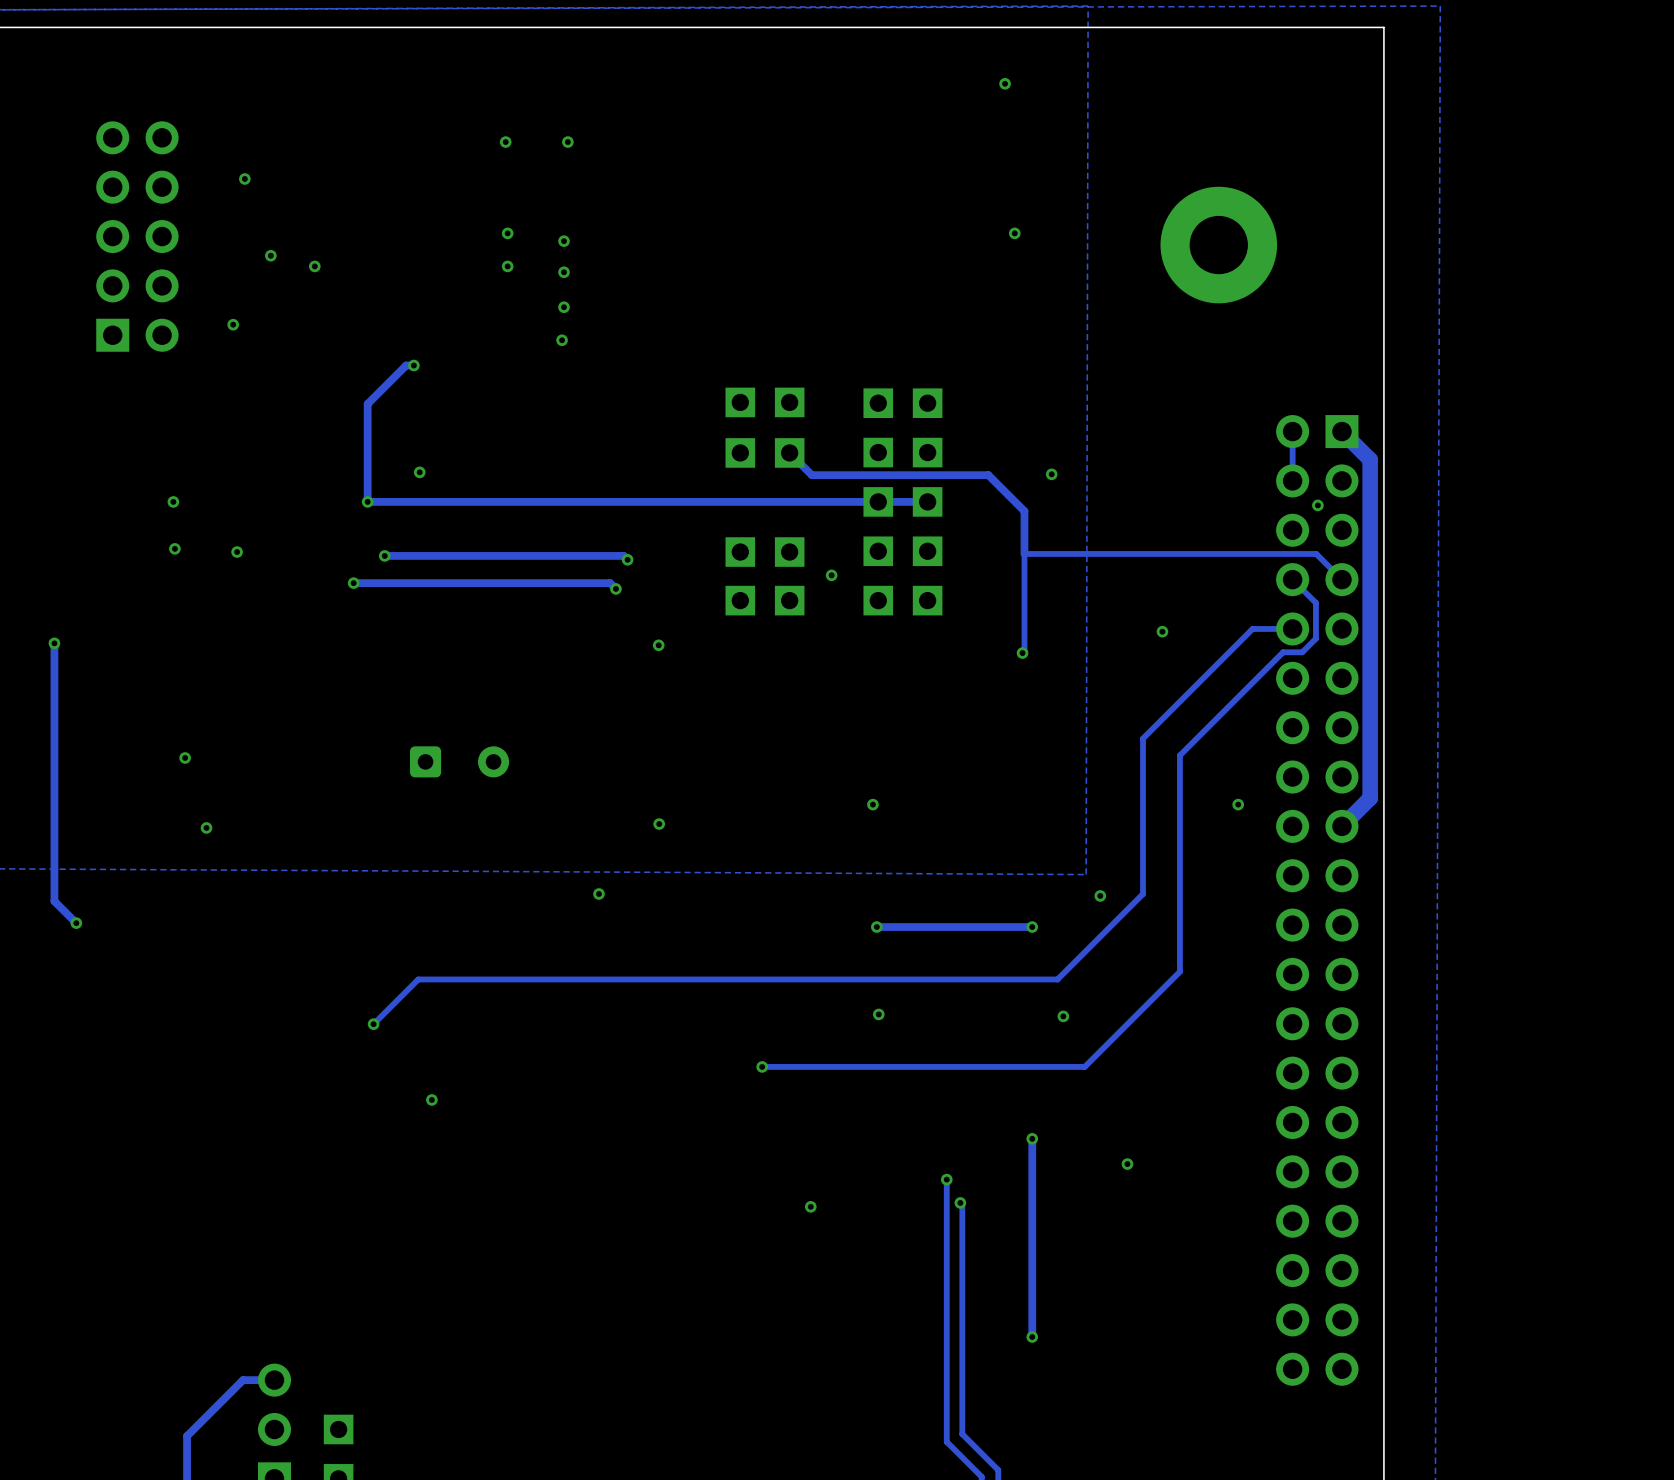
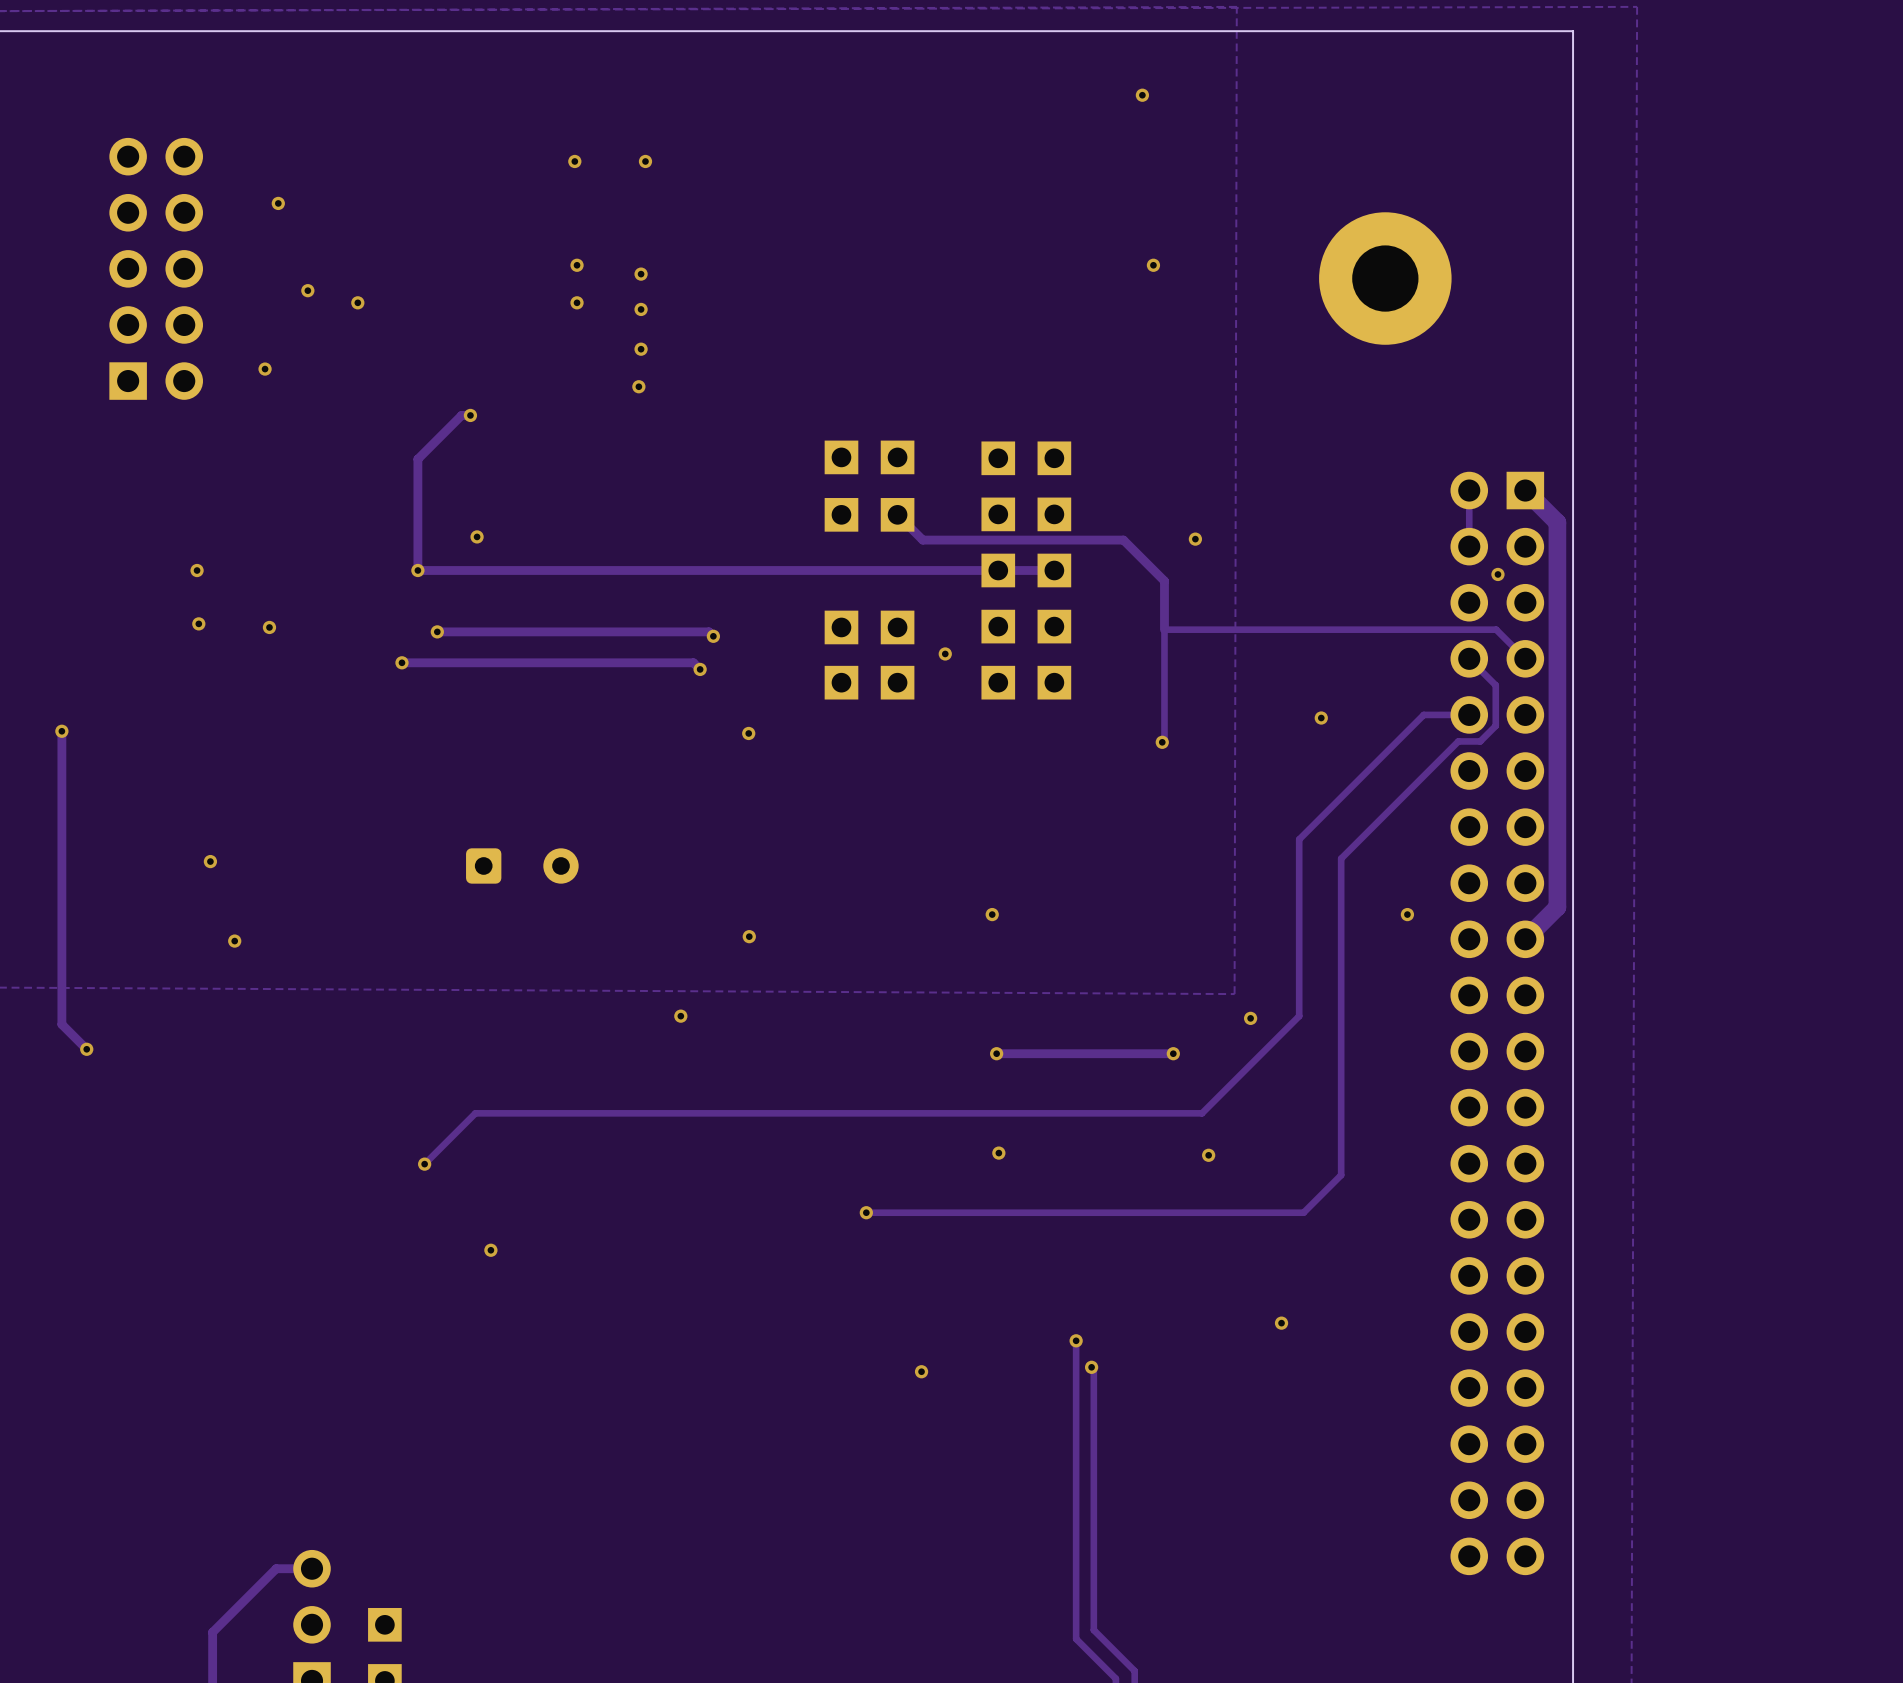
track: (1179, 971) (1084, 1066) -> (1341, 1104) (1341, 1175) (1303, 1212) (1232, 1212)
track: (1032, 1138) (1032, 1337) -> none
via: (1032, 1138) -> none
via: (1032, 1337) -> none

